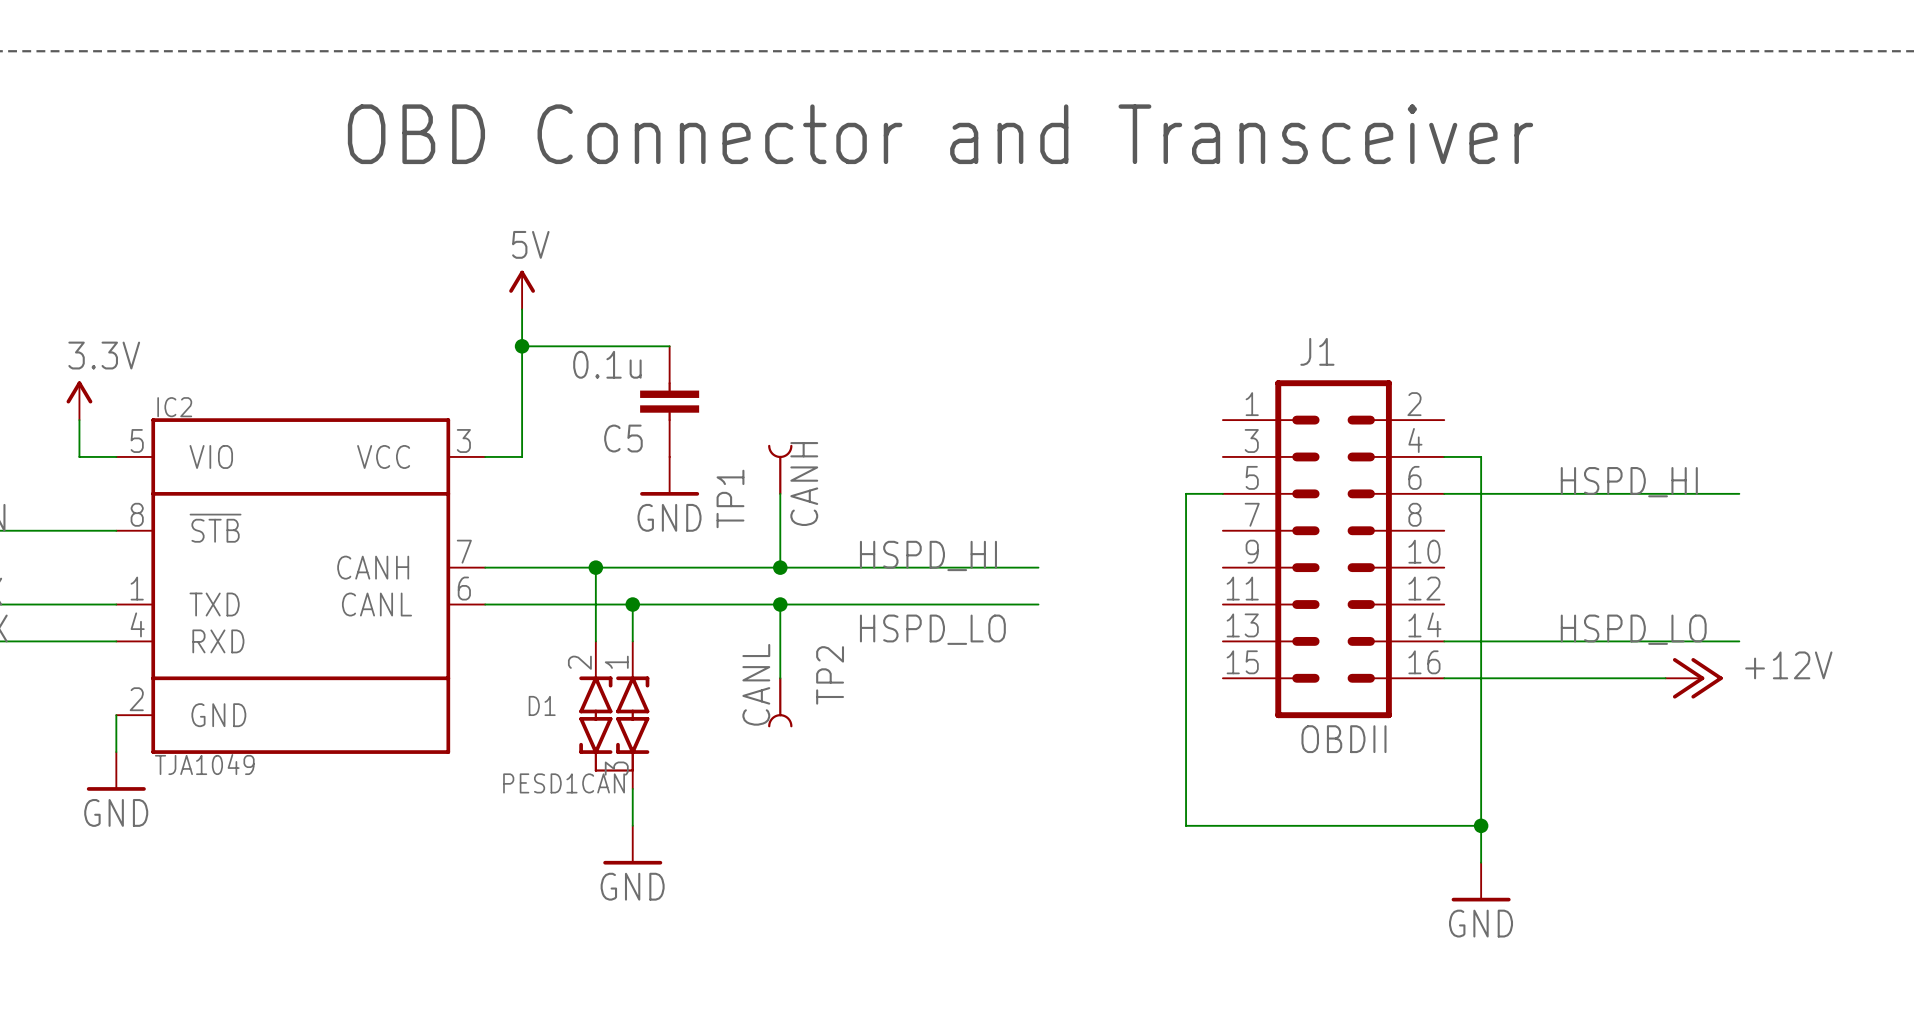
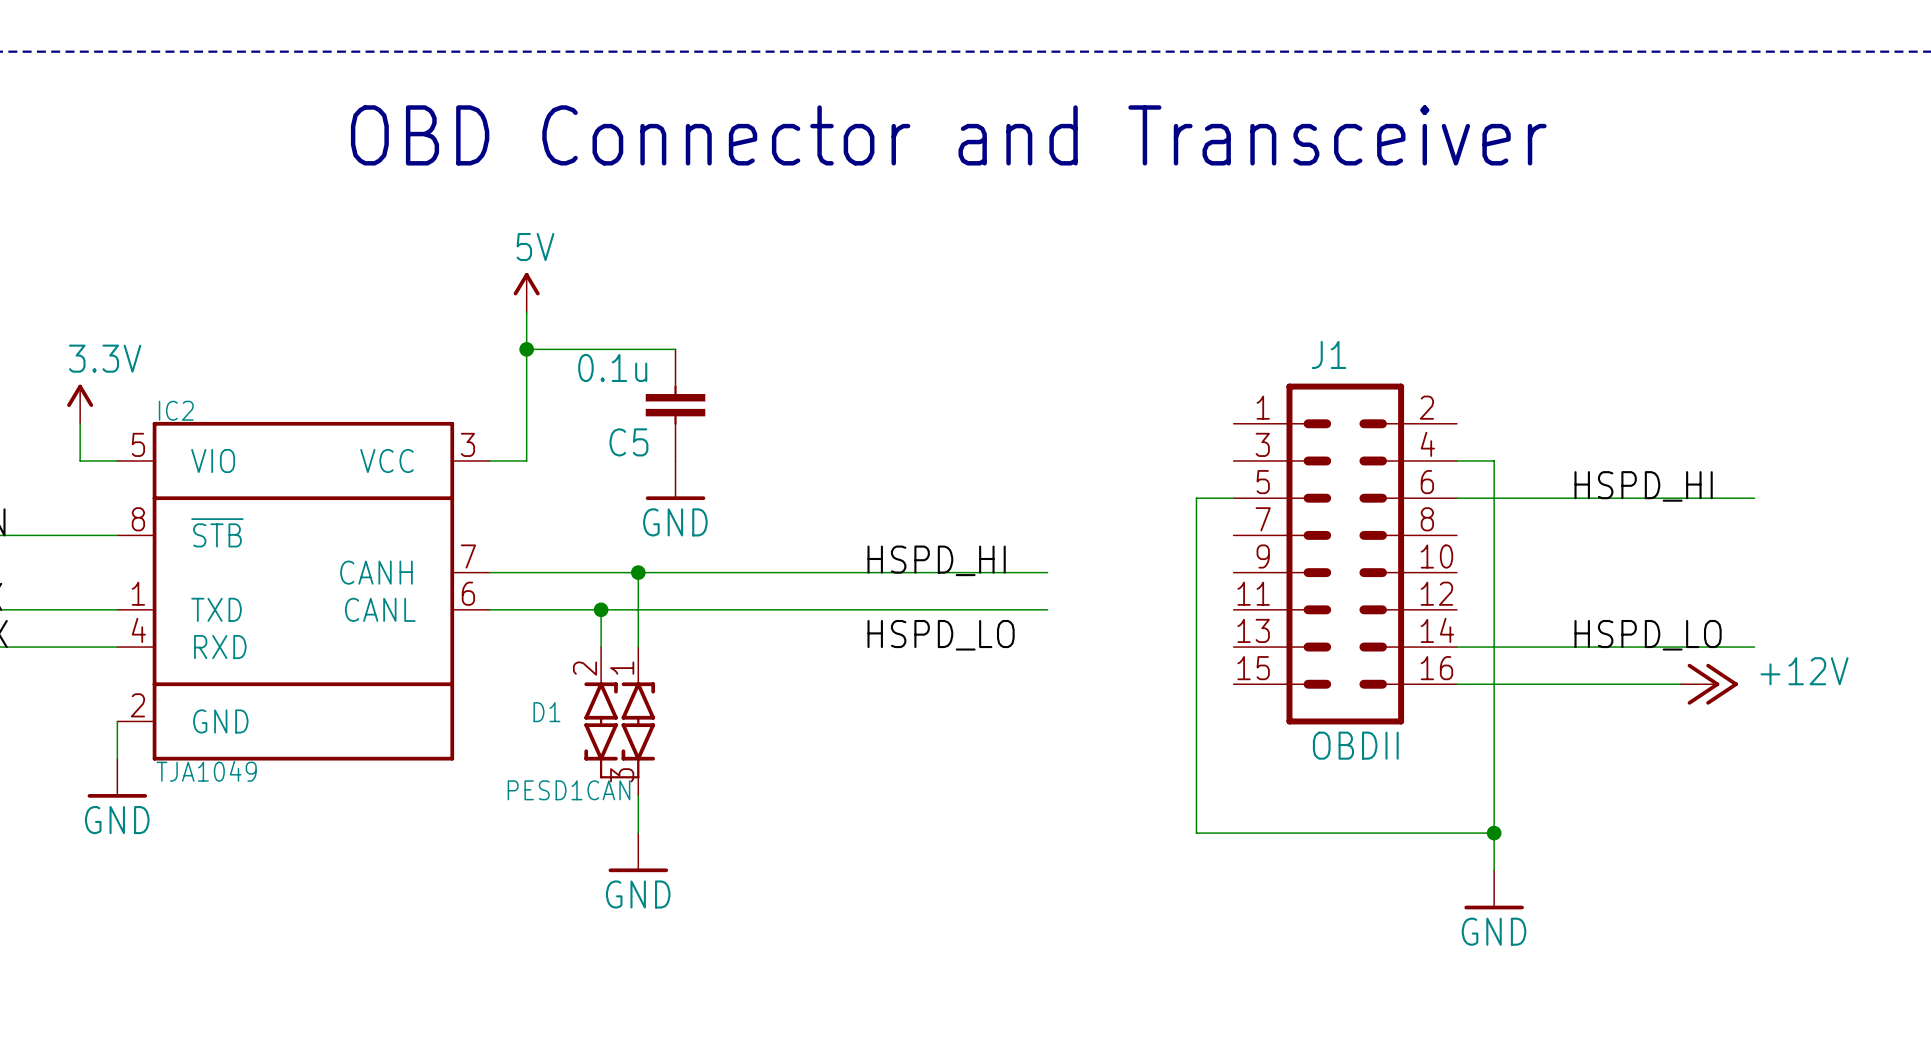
TP1: CANH (780, 469) -> none
wire: (780, 493) (780, 567) -> none
wire: (595, 567) (595, 604) -> (638, 572) (638, 609)
junction: (595, 567) -> none
junction: none -> (638, 572)
junction: (780, 567) -> none
junction: none -> (601, 609)
junction: (632, 604) -> none
wire: (780, 604) (780, 678) -> none
junction: (780, 604) -> none
TP2: CANL (780, 702) -> none

